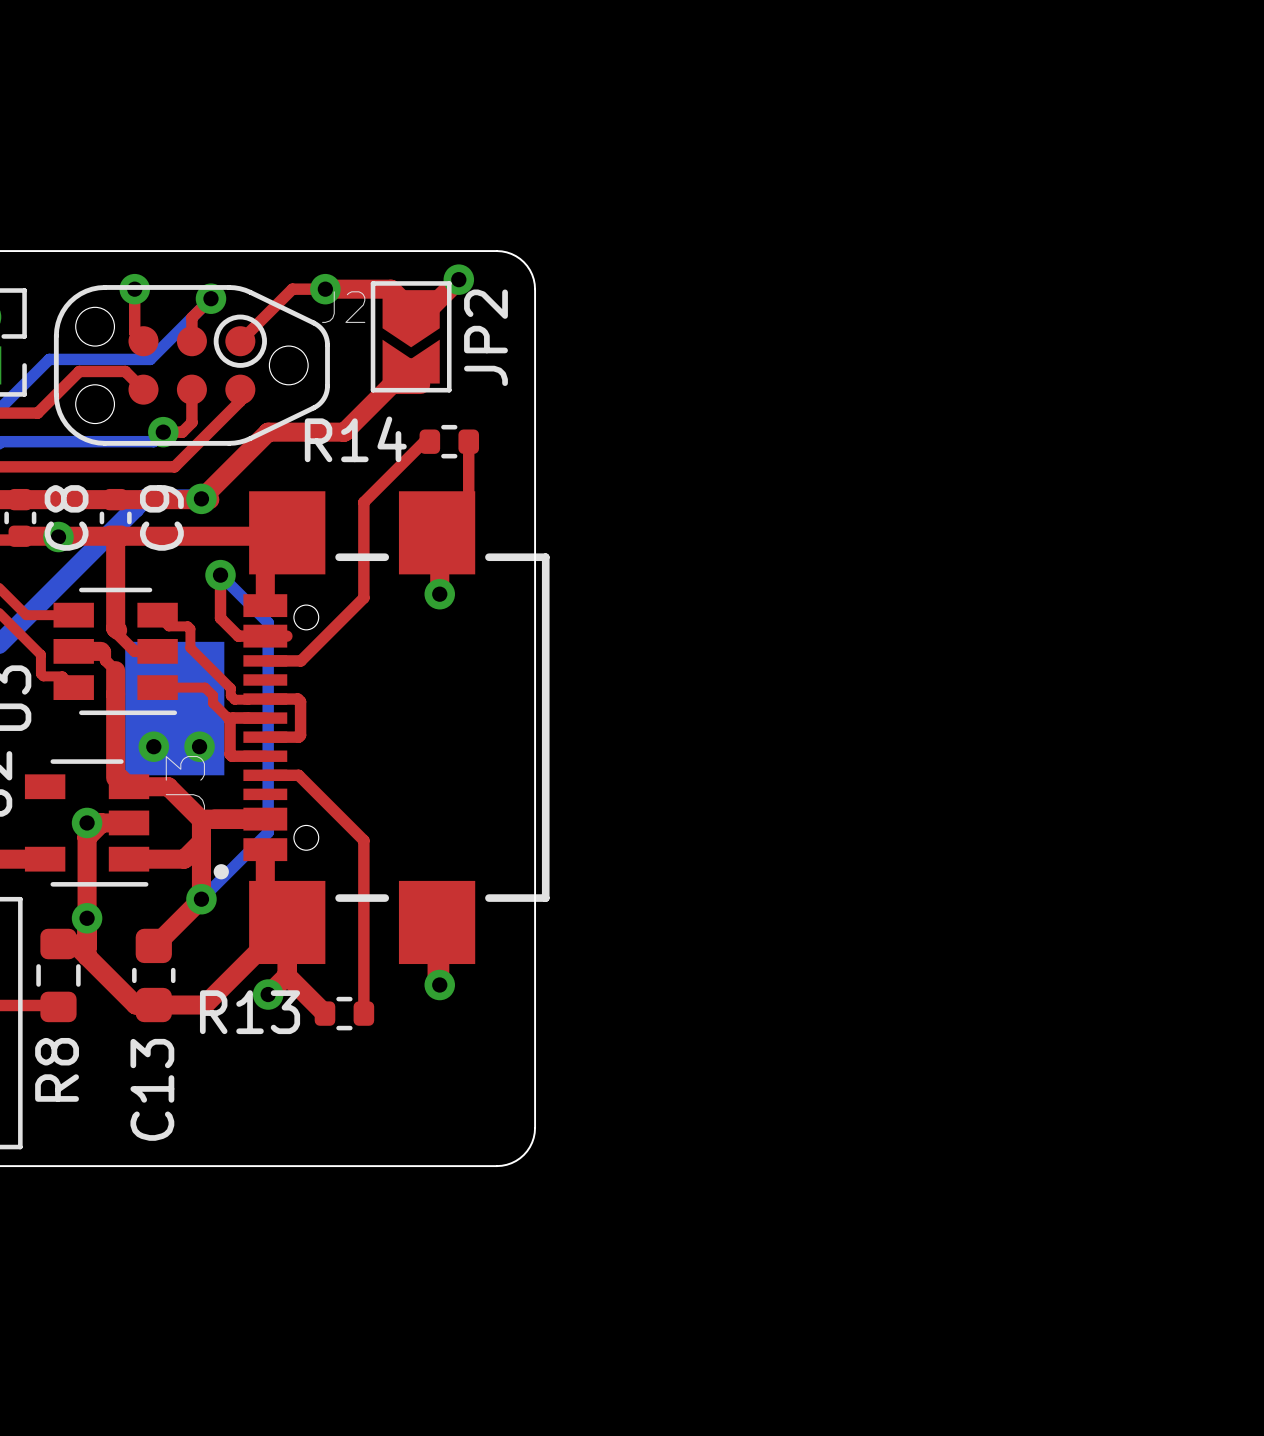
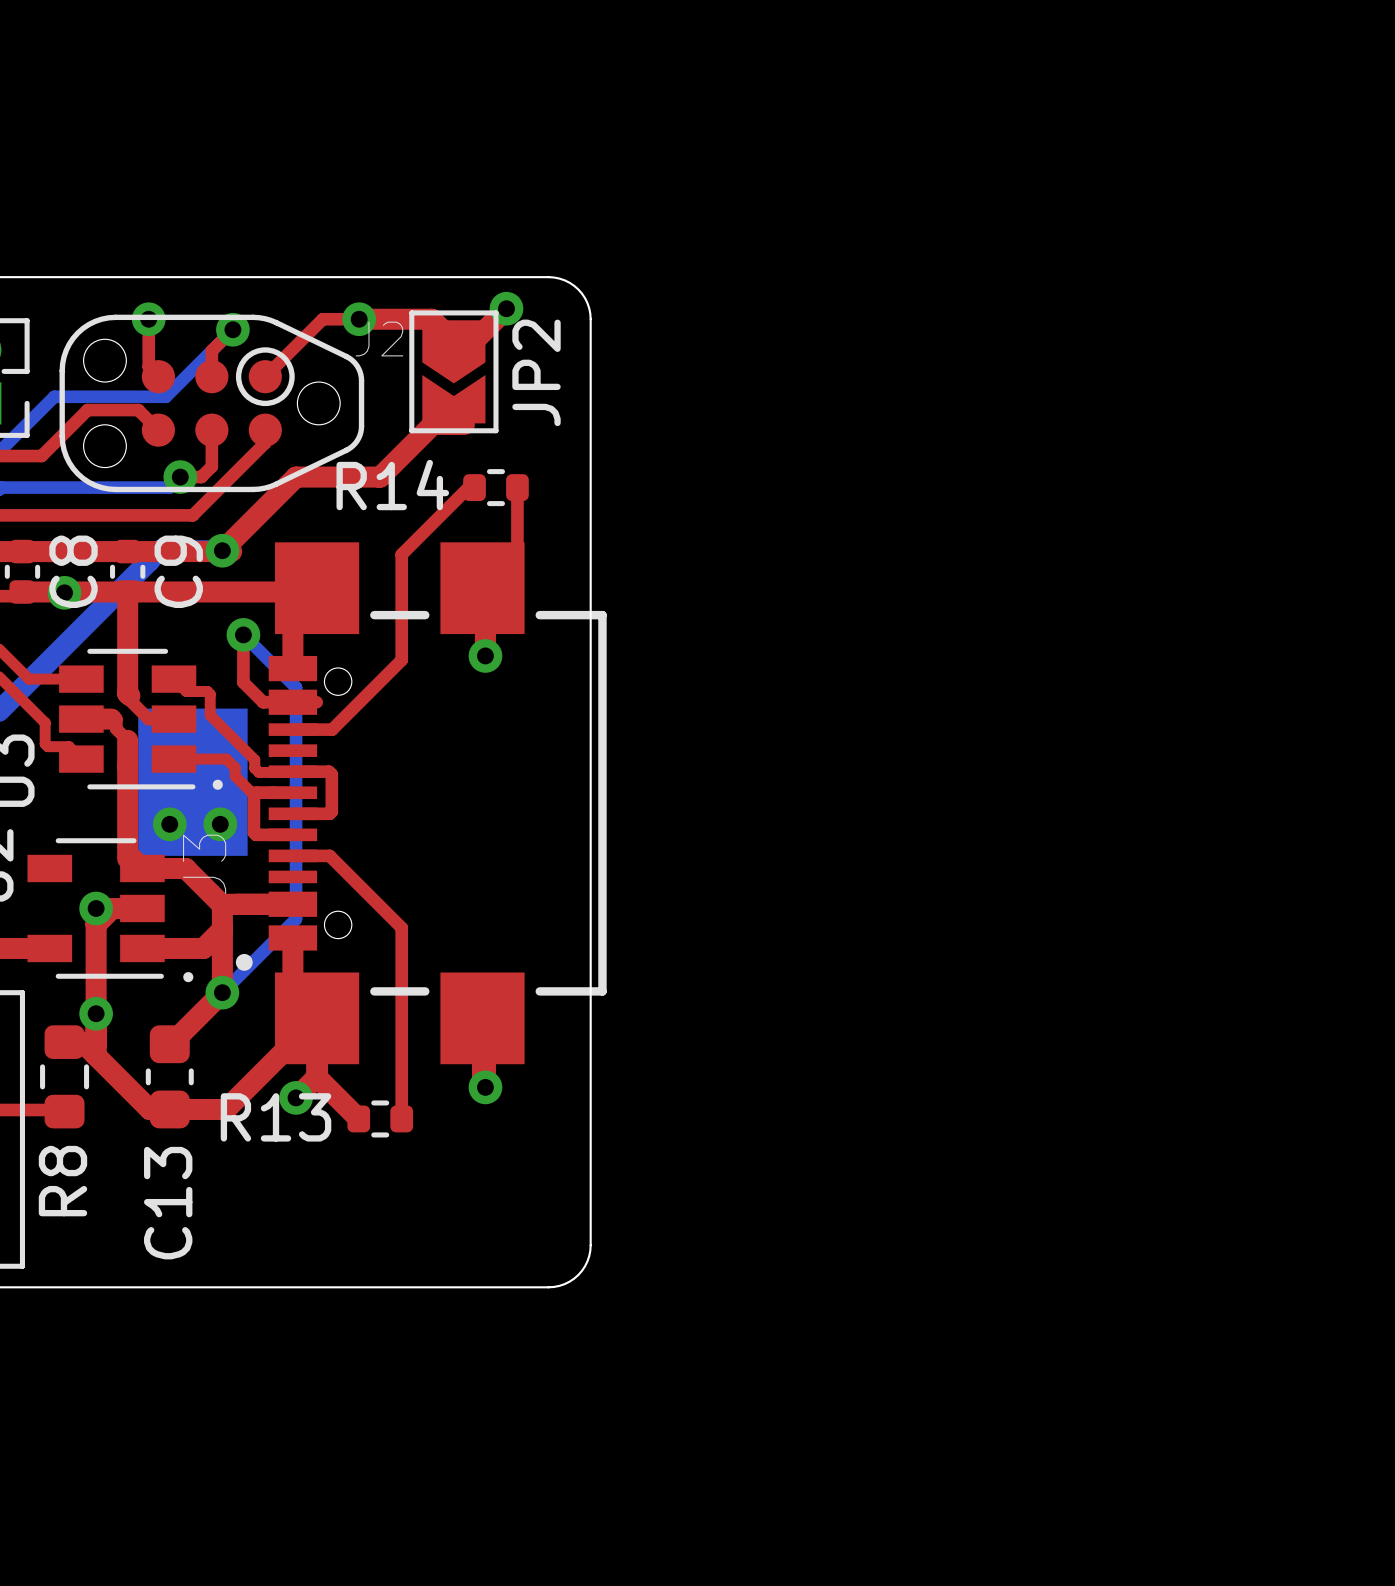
drawing: none -> [212, 779, 223, 790]
drawing: none -> [183, 972, 194, 983]

